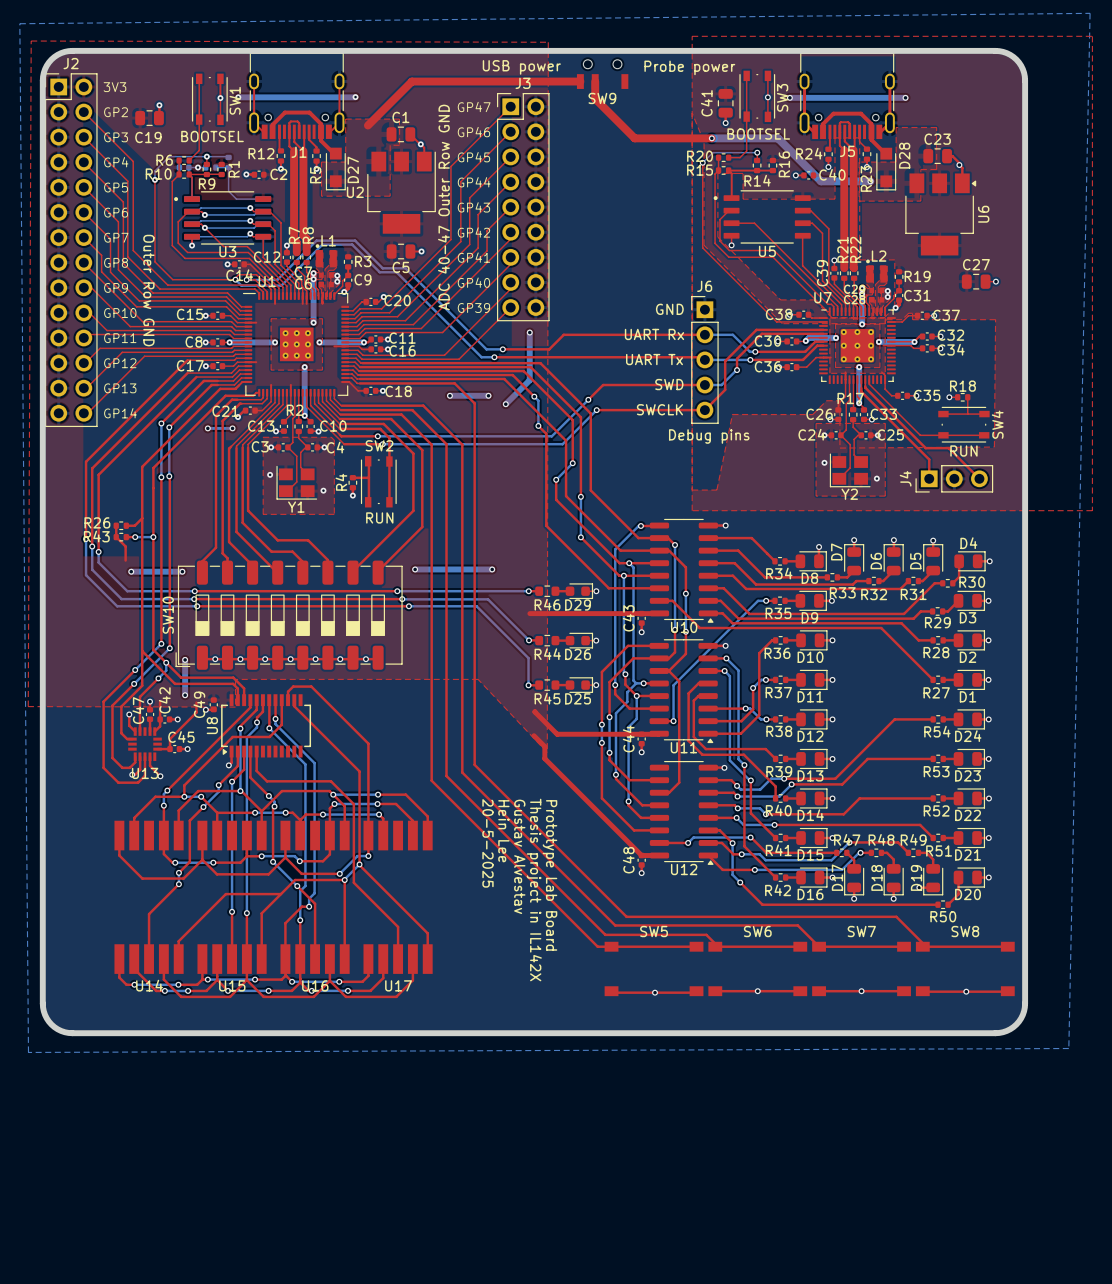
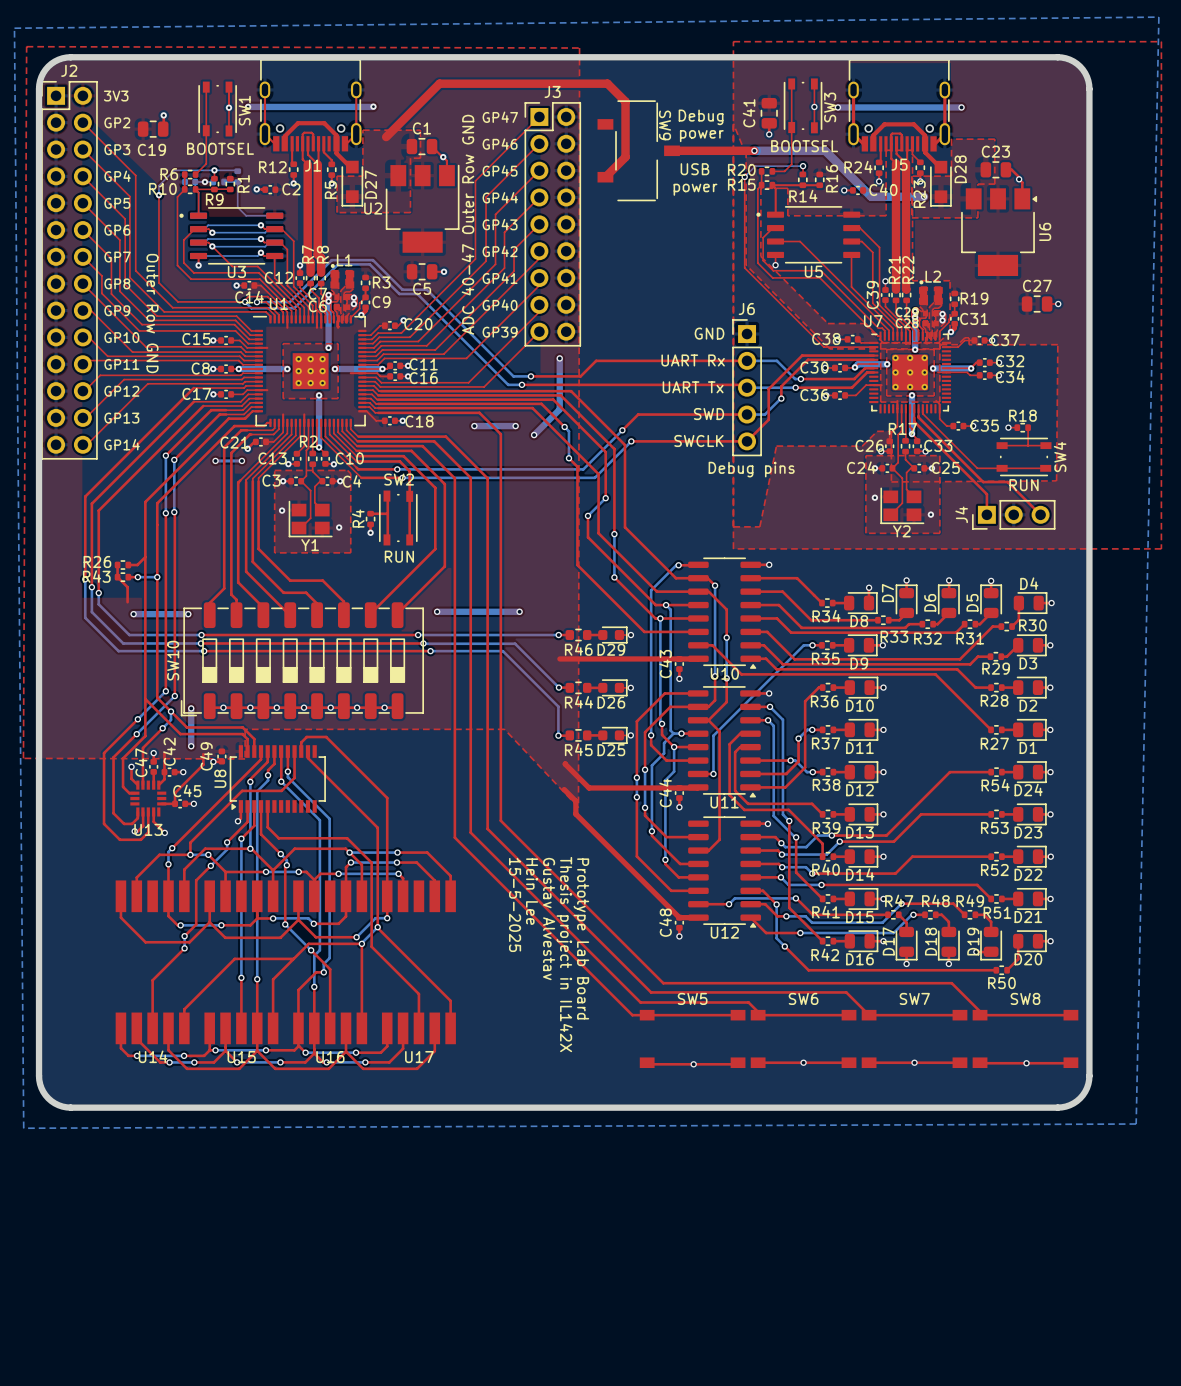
SW9 footprint: [576, 59, 629, 89] -> [597, 100, 680, 201]
text: USB power (521, 67) -> none
text: Probe power (689, 67) -> none
top track: (580, 81) (411, 81) (367, 125) -> none
top track: (595, 81) (595, 98) (634, 138) -> none
SW9 name position: SW9 (602, 98) -> SW9 (665, 125)
text: none -> Debug (701, 117)
text: none -> power (701, 136)
top track: none -> (386, 137) (439, 83) (607, 83) (625, 101) (625, 157) (605, 177)
text: none -> USB (694, 169)
text: none -> power (695, 189)
text: 20-5-2025 (487, 843) -> 15-5-2025 (515, 904)

